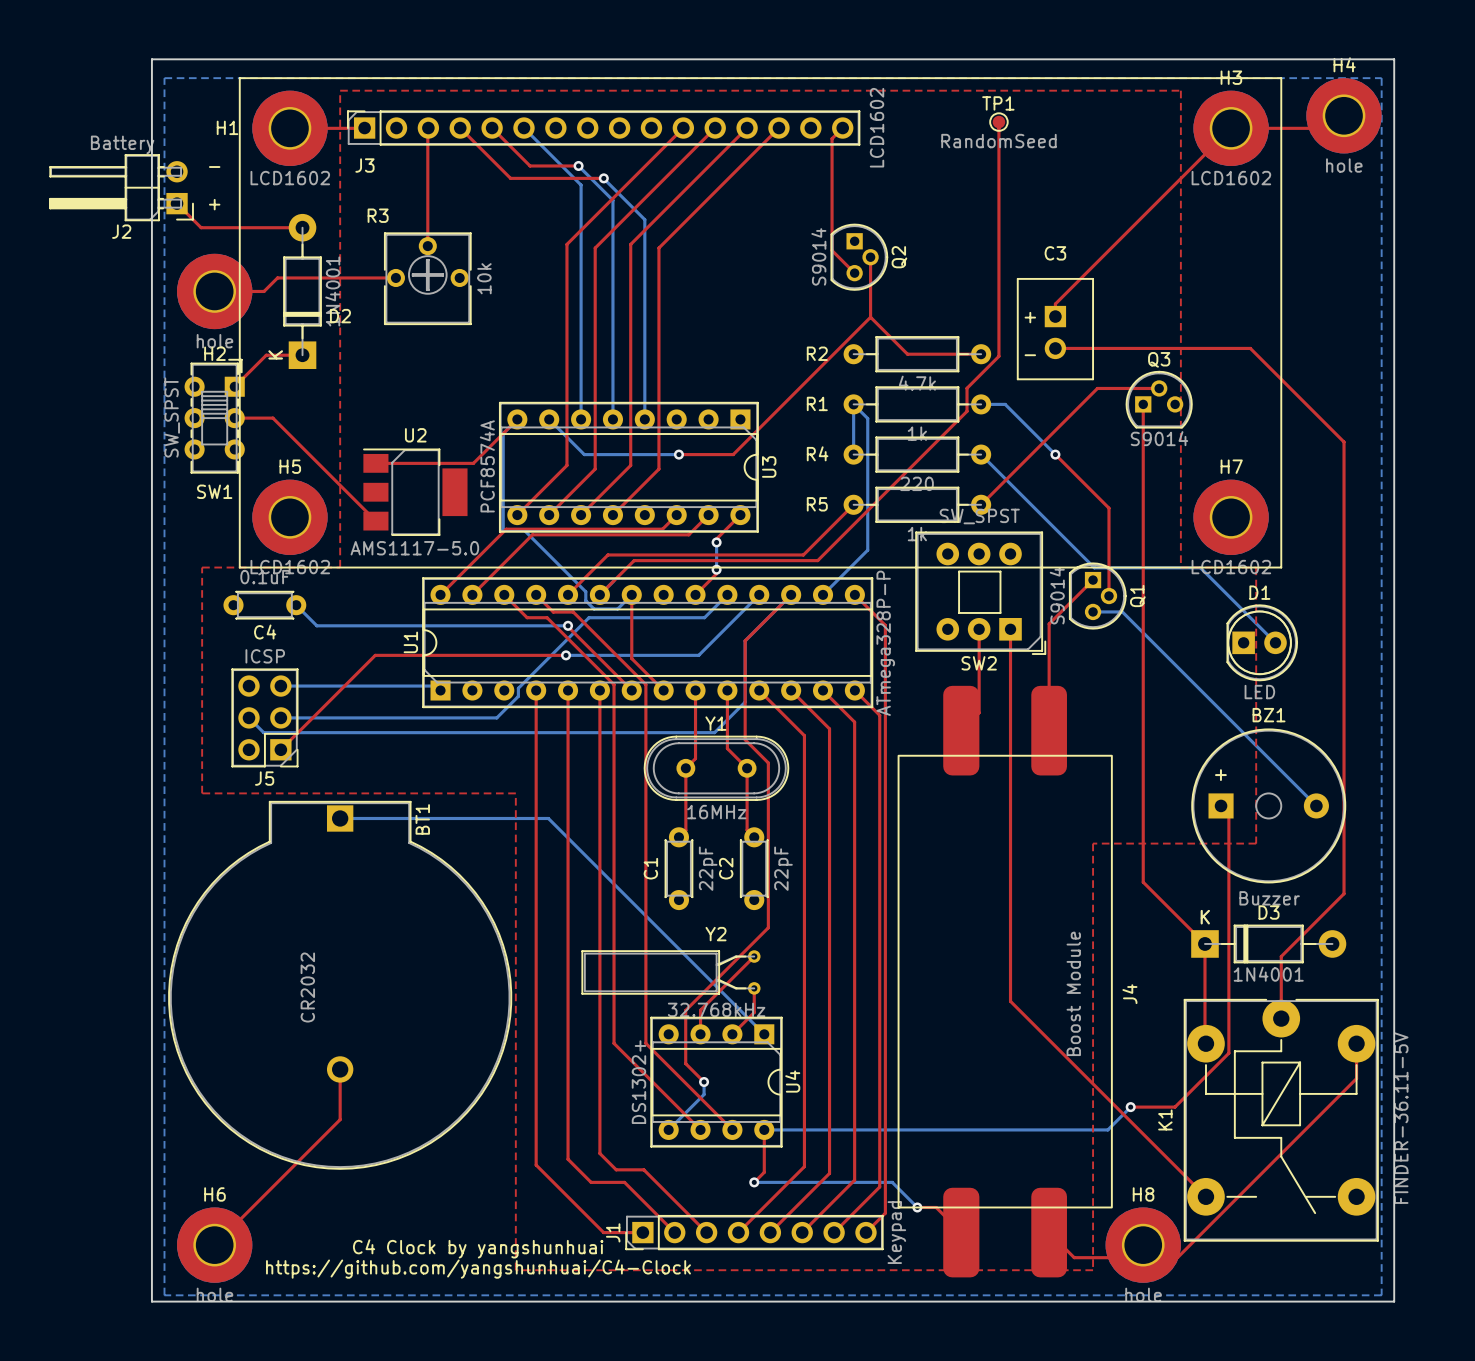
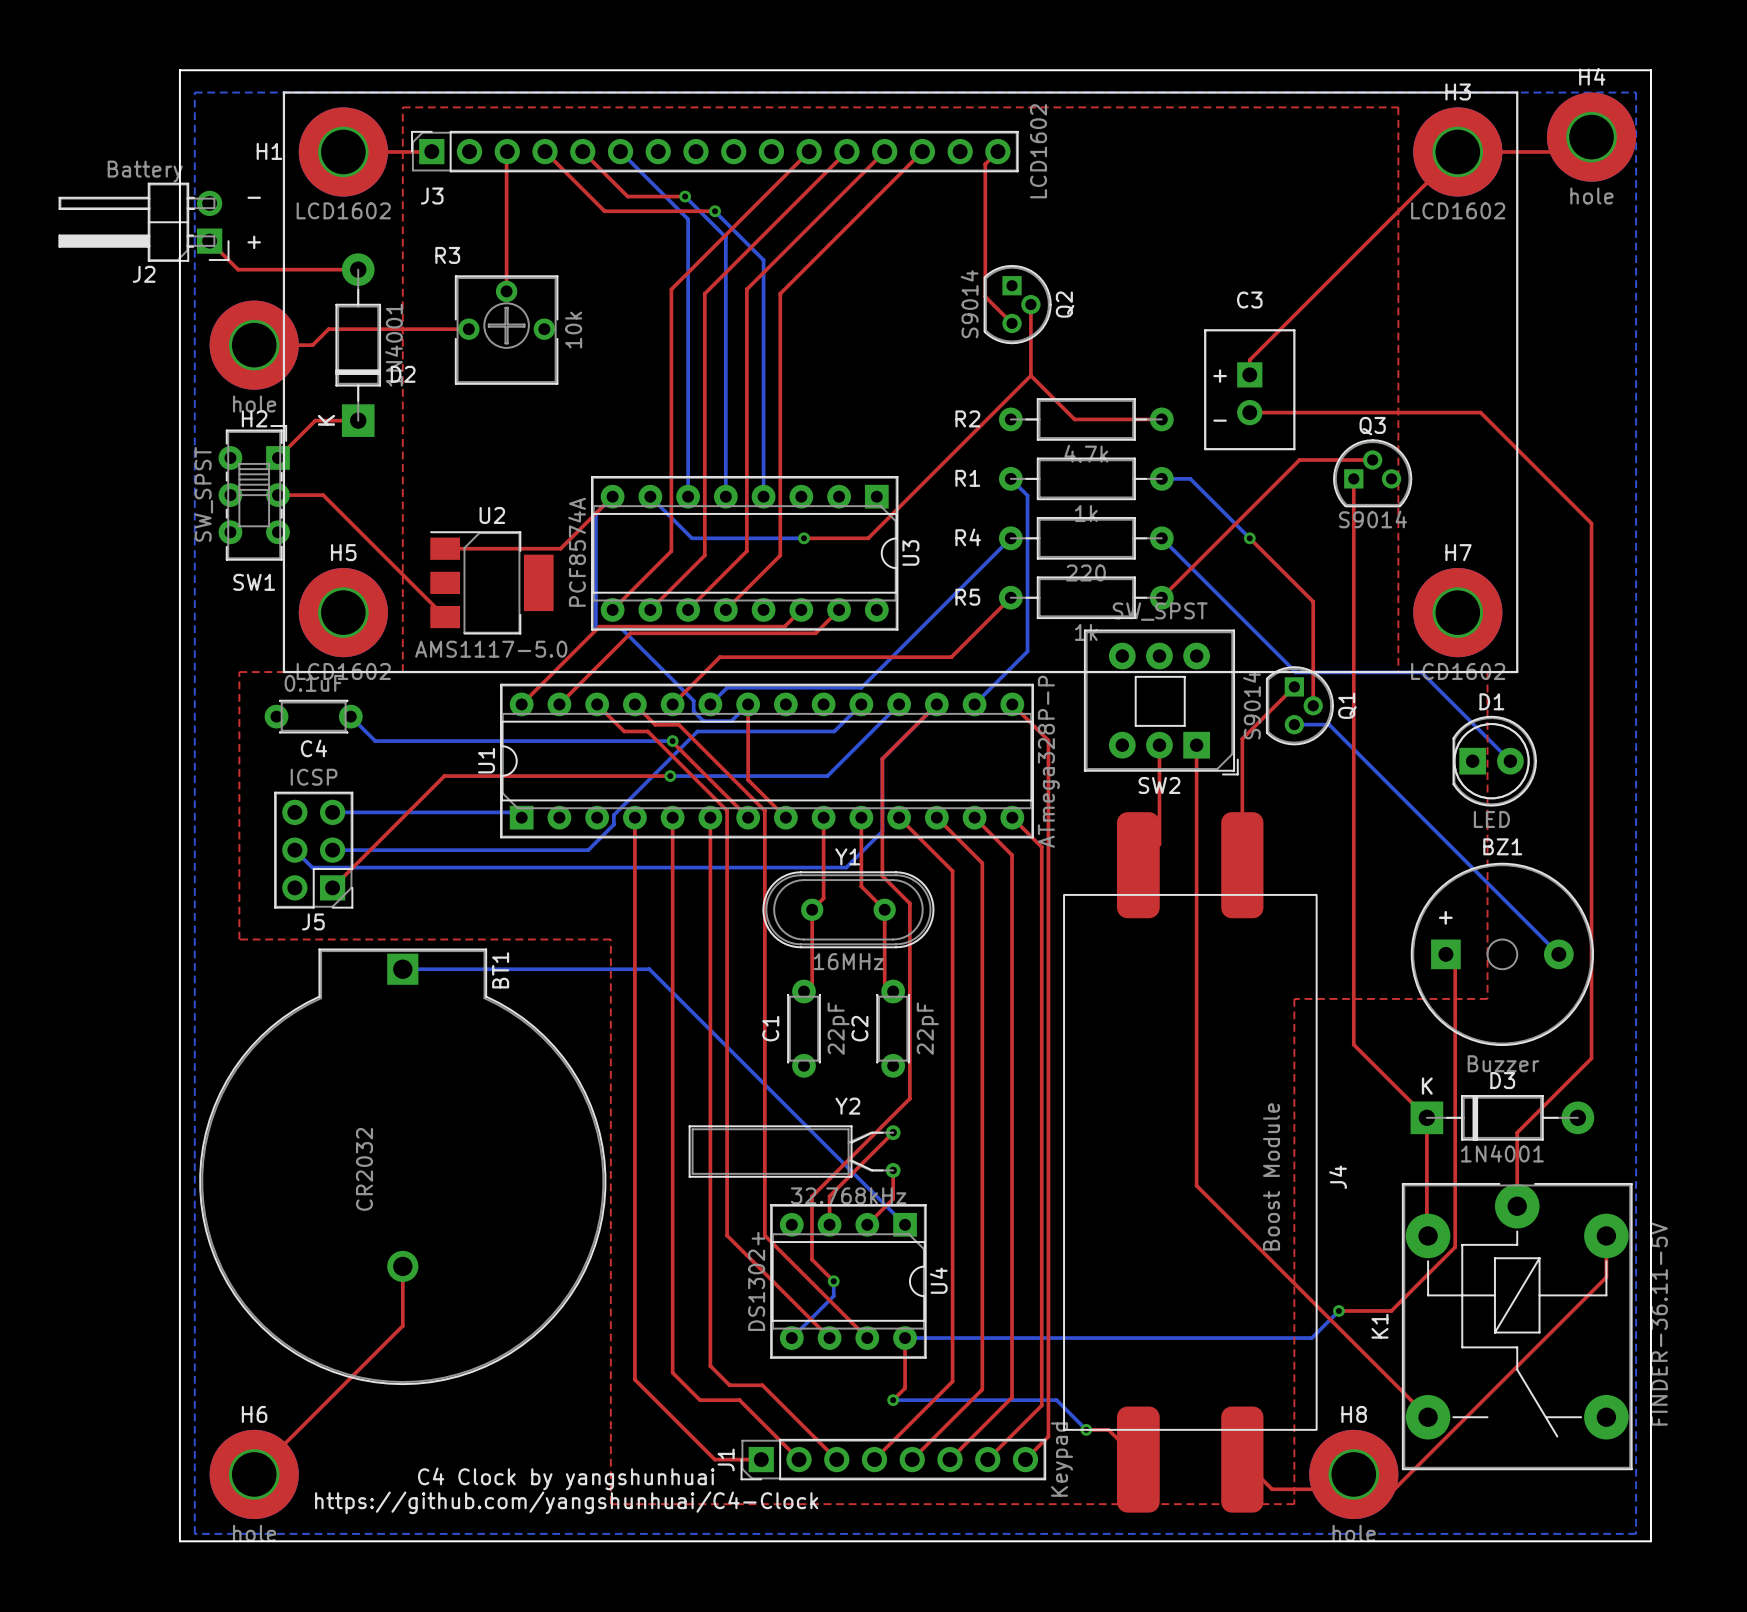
top track: (998, 122) (998, 356) (967, 388) (967, 411) (817, 560) (634, 560) (599, 594) -> none
TP1: RandomSeed (998, 122) -> none
bottom track: (853, 404) (853, 454) -> (727, 687) (861, 687) (1010, 538)
top track: (740, 515) (716, 538) (716, 542) -> none
bottom track: (716, 542) (716, 569) -> none
via: (716, 542) -> none
top track: (716, 569) (716, 573) (695, 594) -> none
via: (716, 569) -> none

